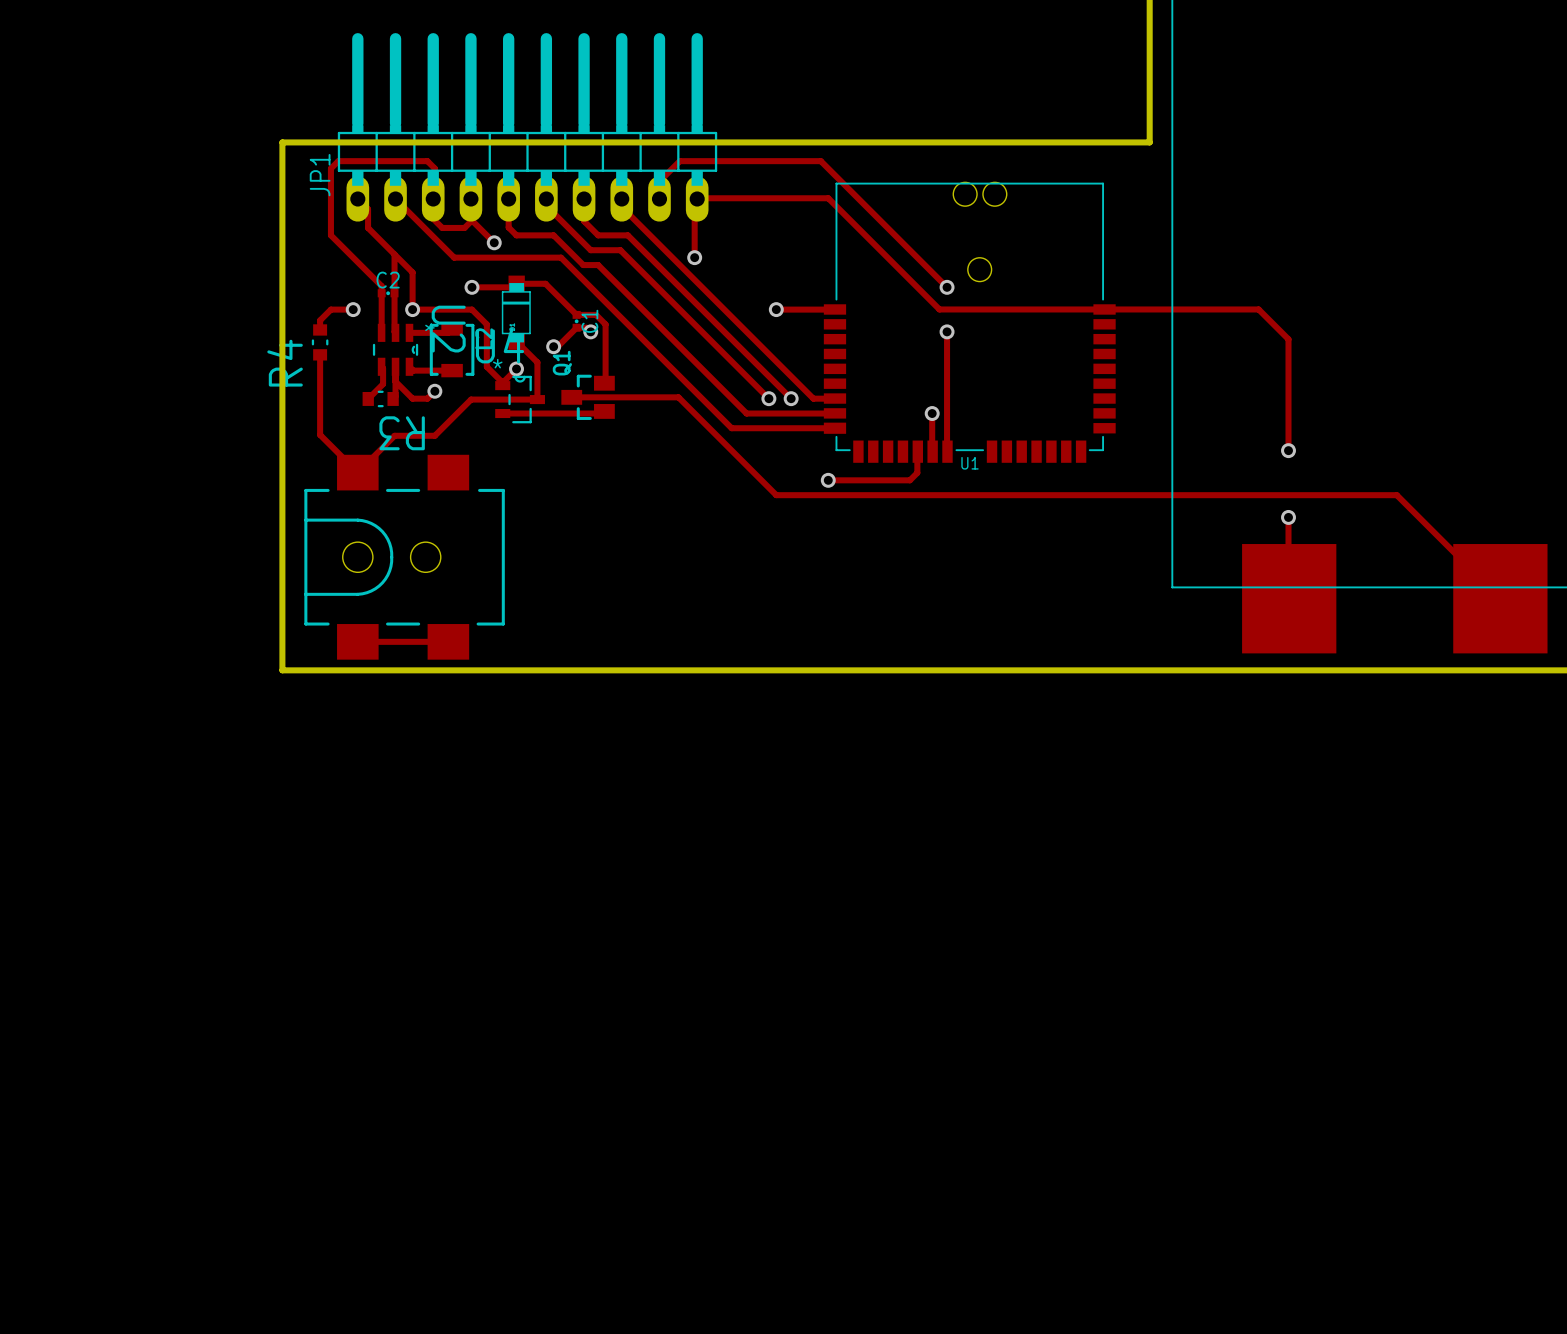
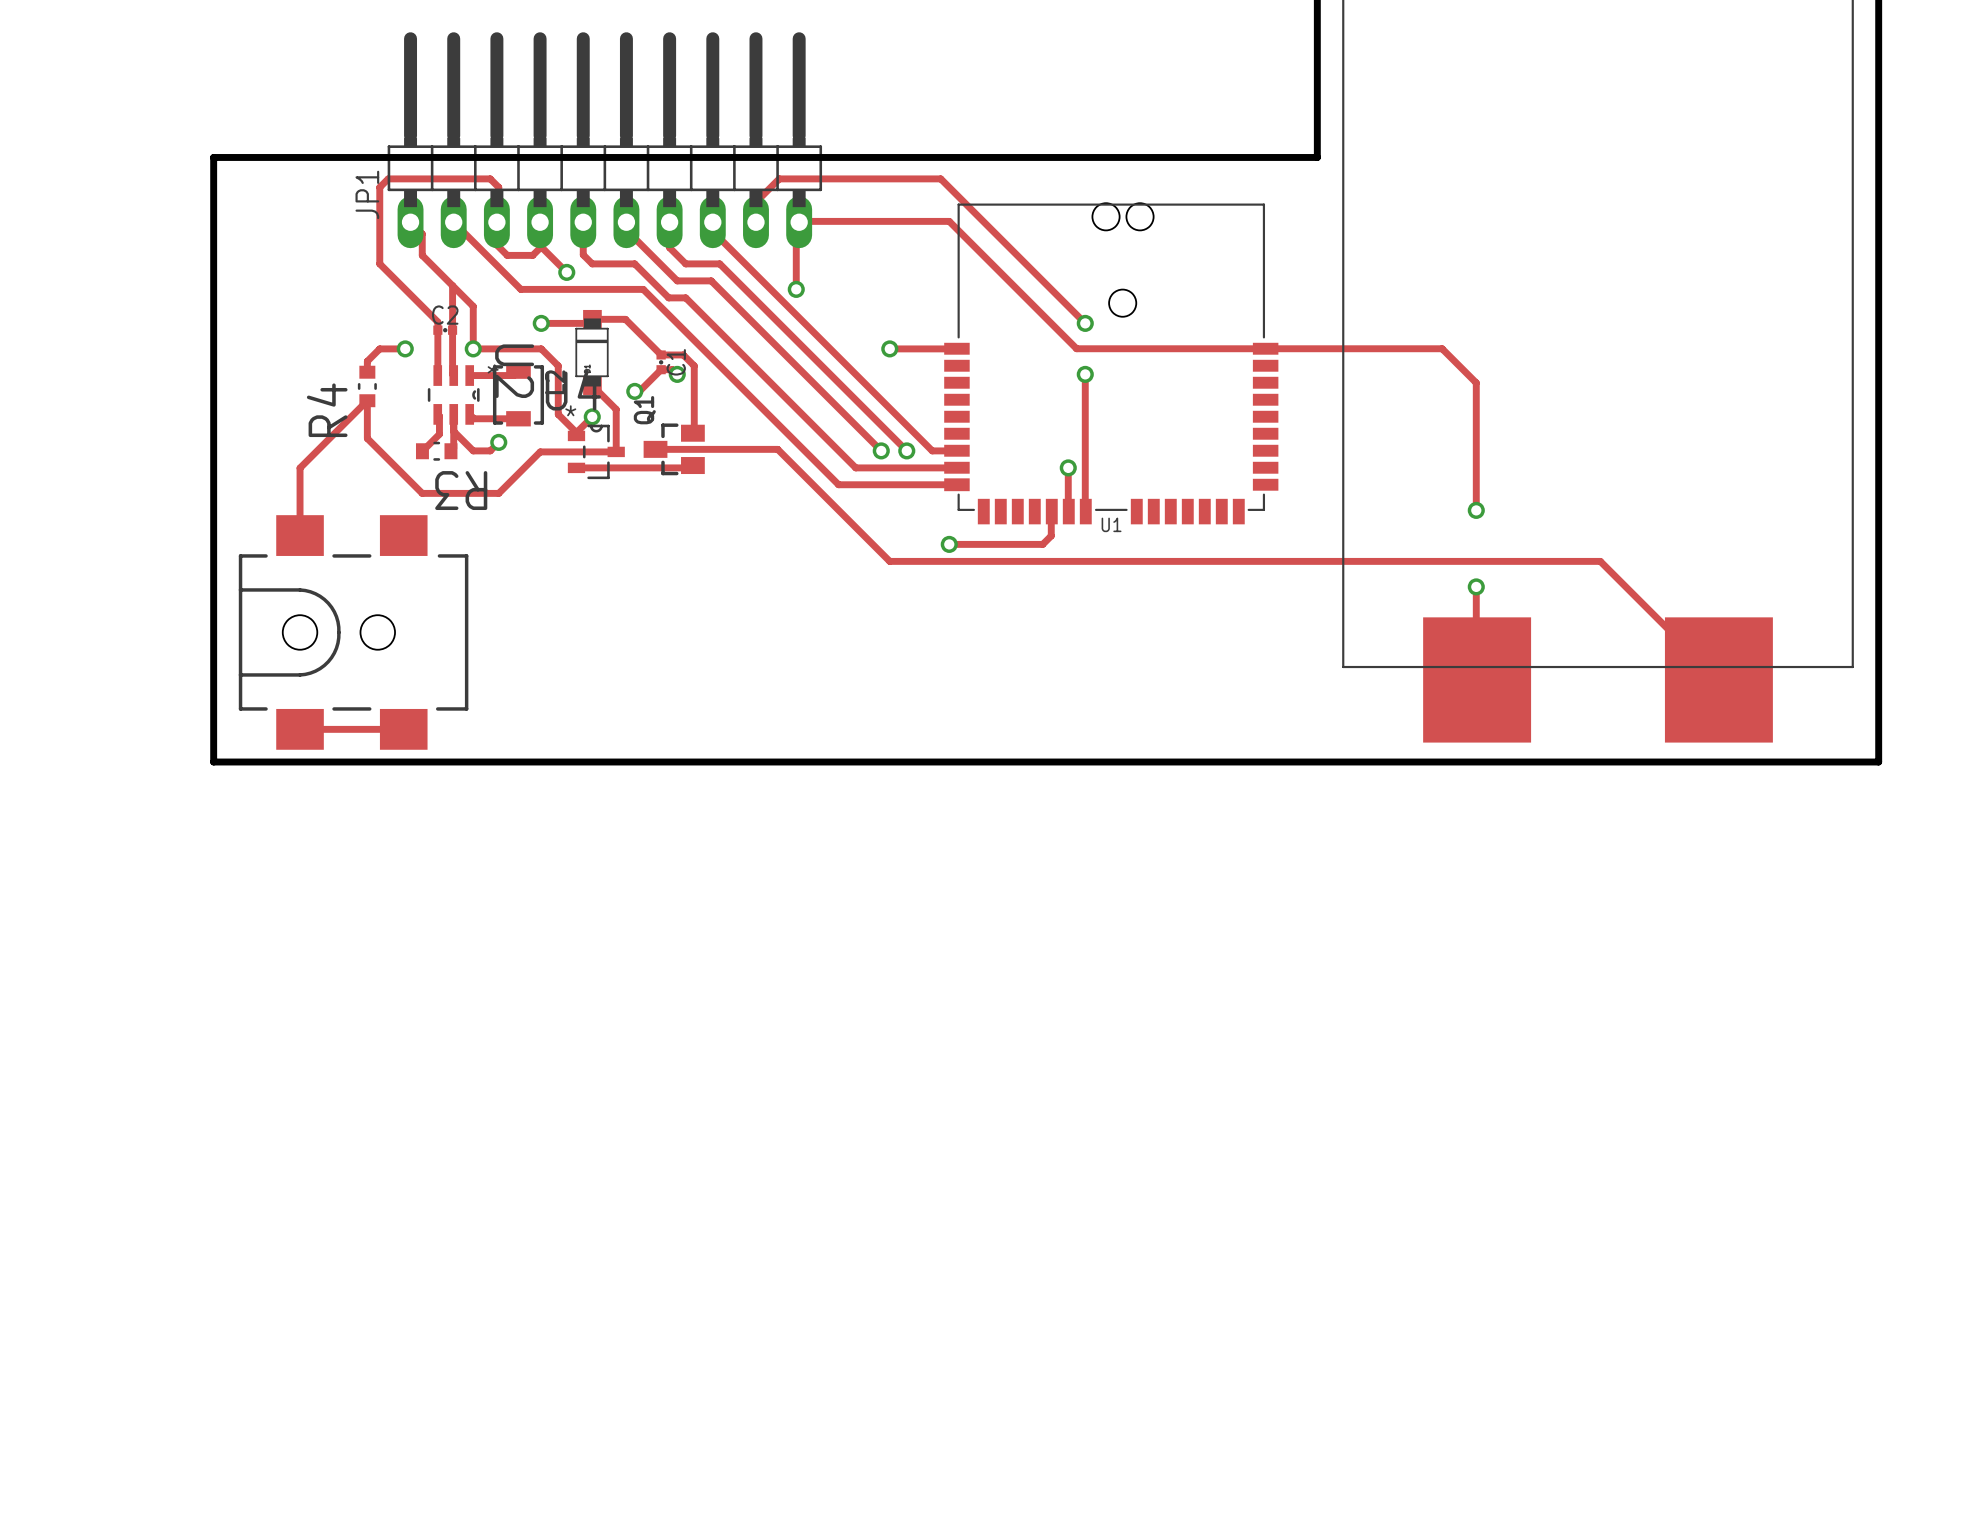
board edge: (282, 142) (282, 670) -> (324, 157) (213, 157) (213, 762) (324, 762)
track: none -> (367, 400) (300, 468) (300, 535)
track: (320, 387) (320, 434) (357, 472) (394, 435) -> (367, 438) (422, 493) (452, 493)
part position: (404, 557) -> (353, 632)
track: (357, 641) (448, 641) -> (300, 729) (403, 729)

